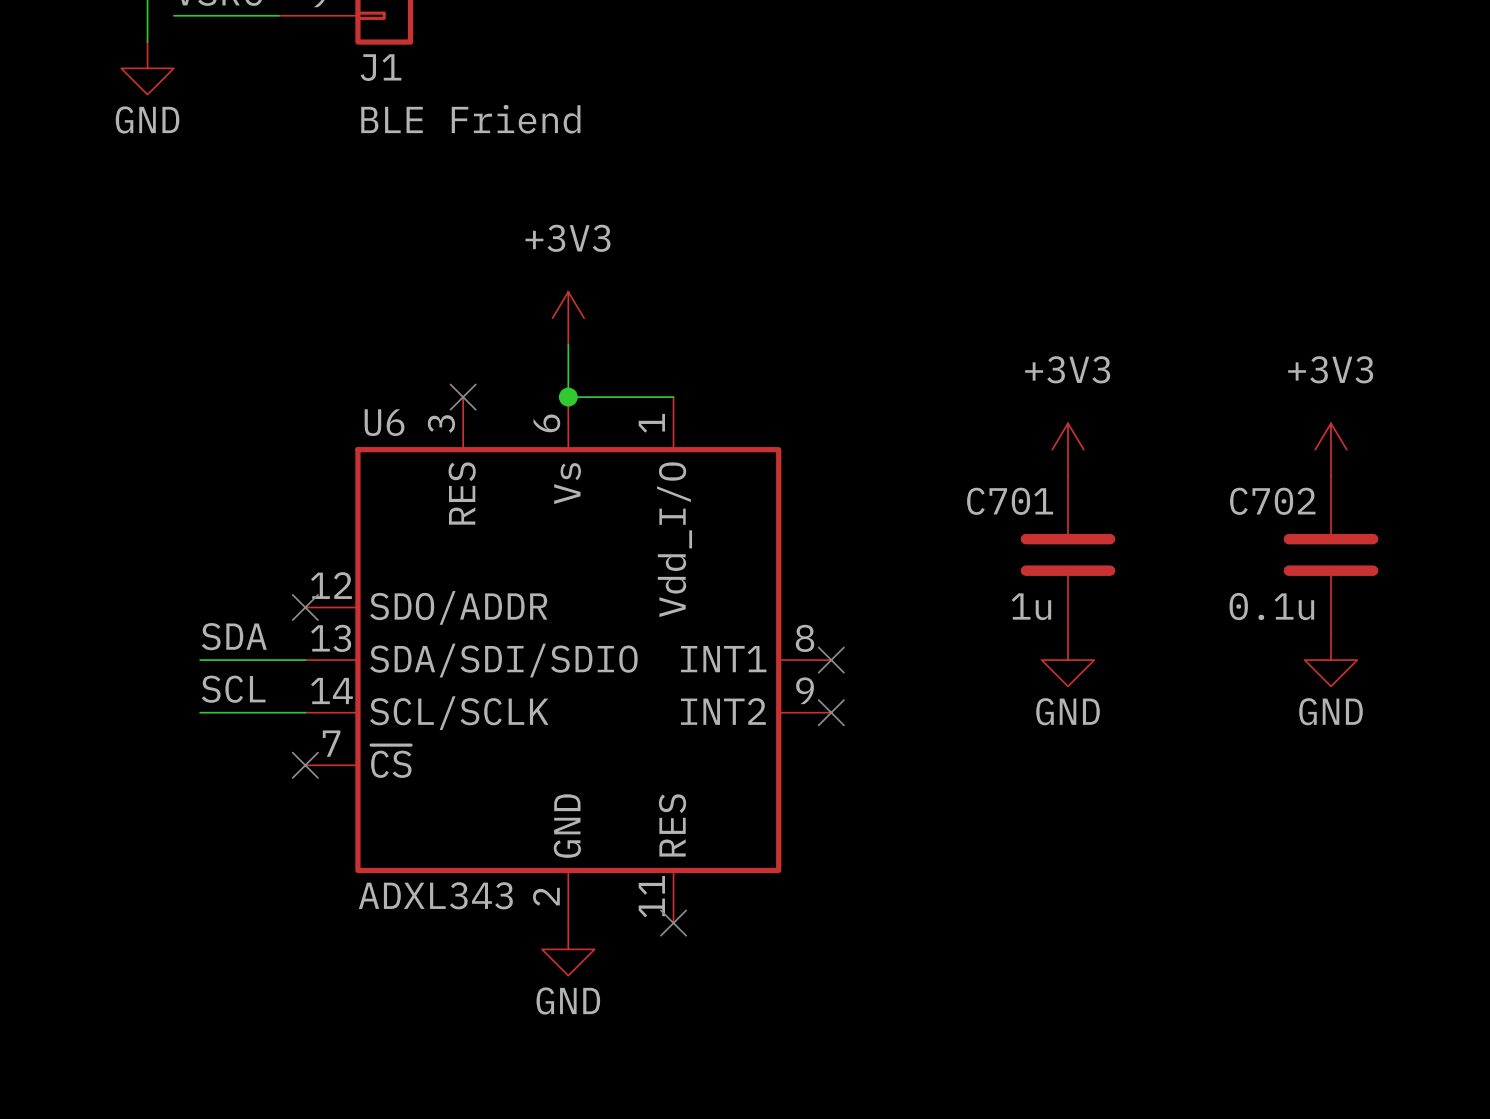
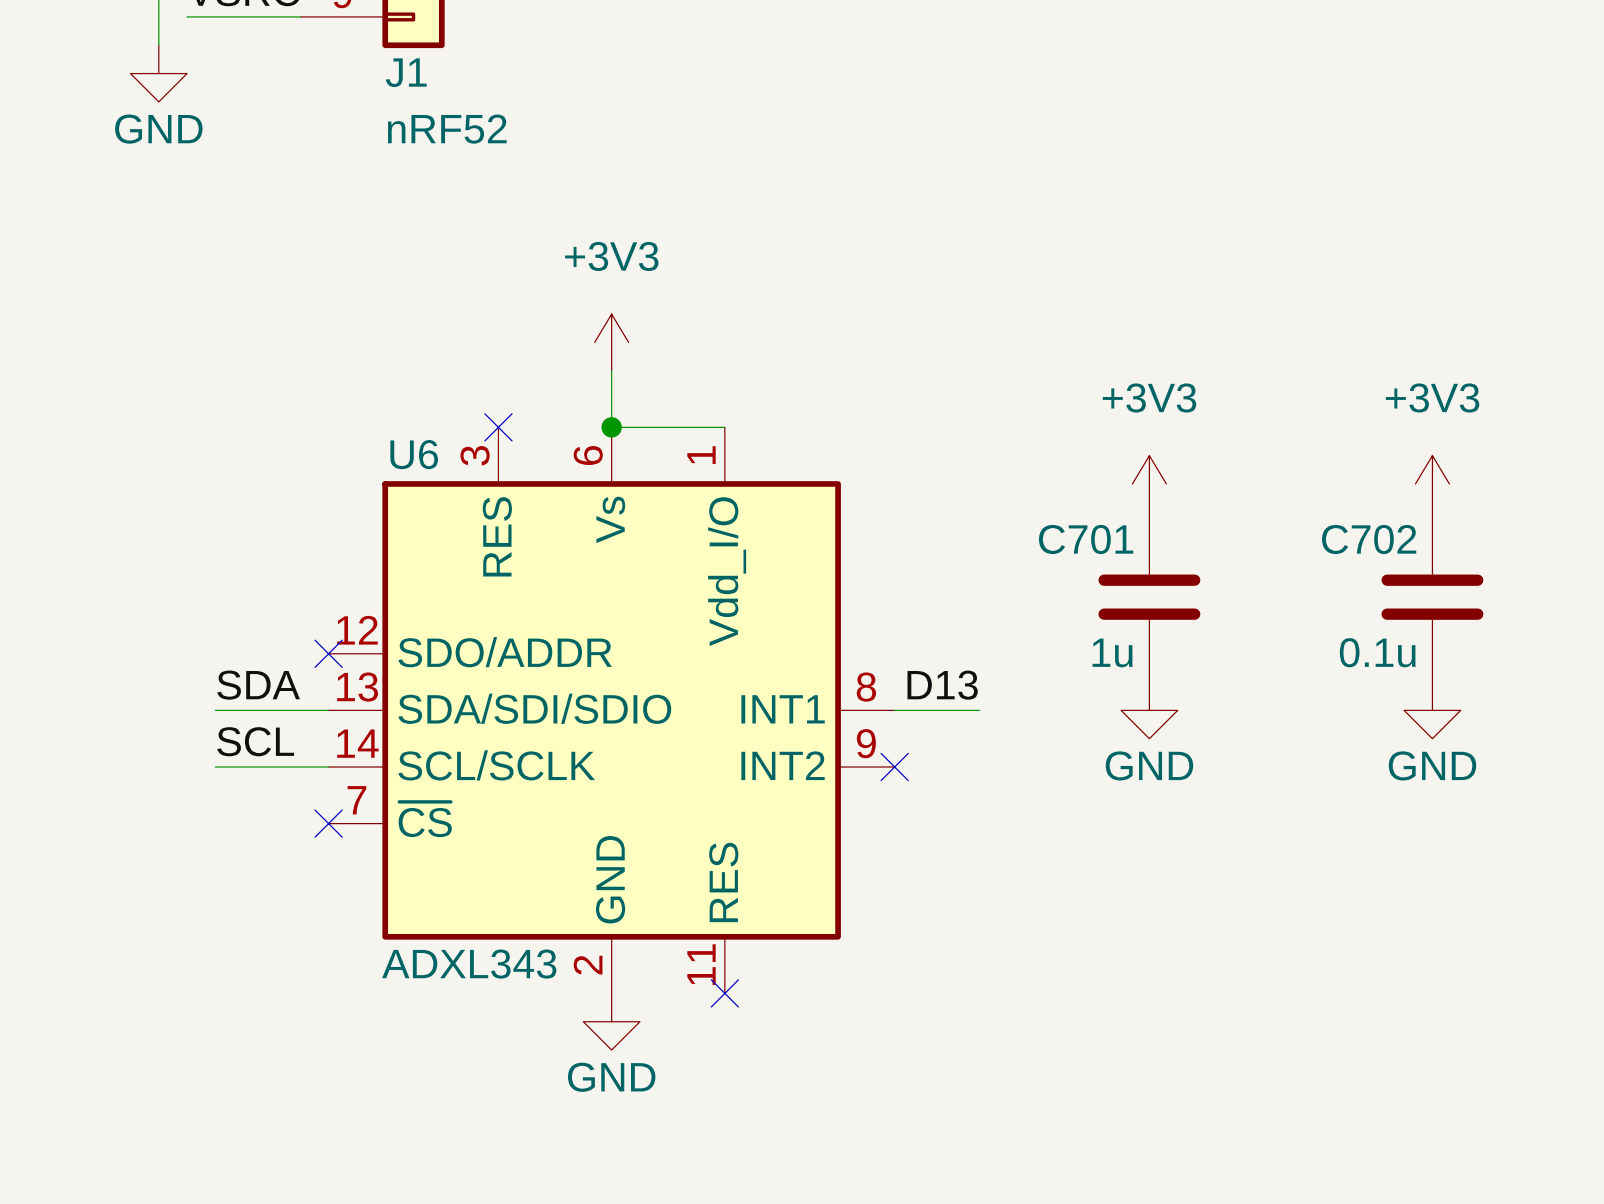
J1 value: BLE Friend (470, 119) -> nRF52 (447, 129)
label: none -> D13 (942, 685)
wire: none -> (894, 710) (979, 710)
no-connect mark: (831, 660) -> none

